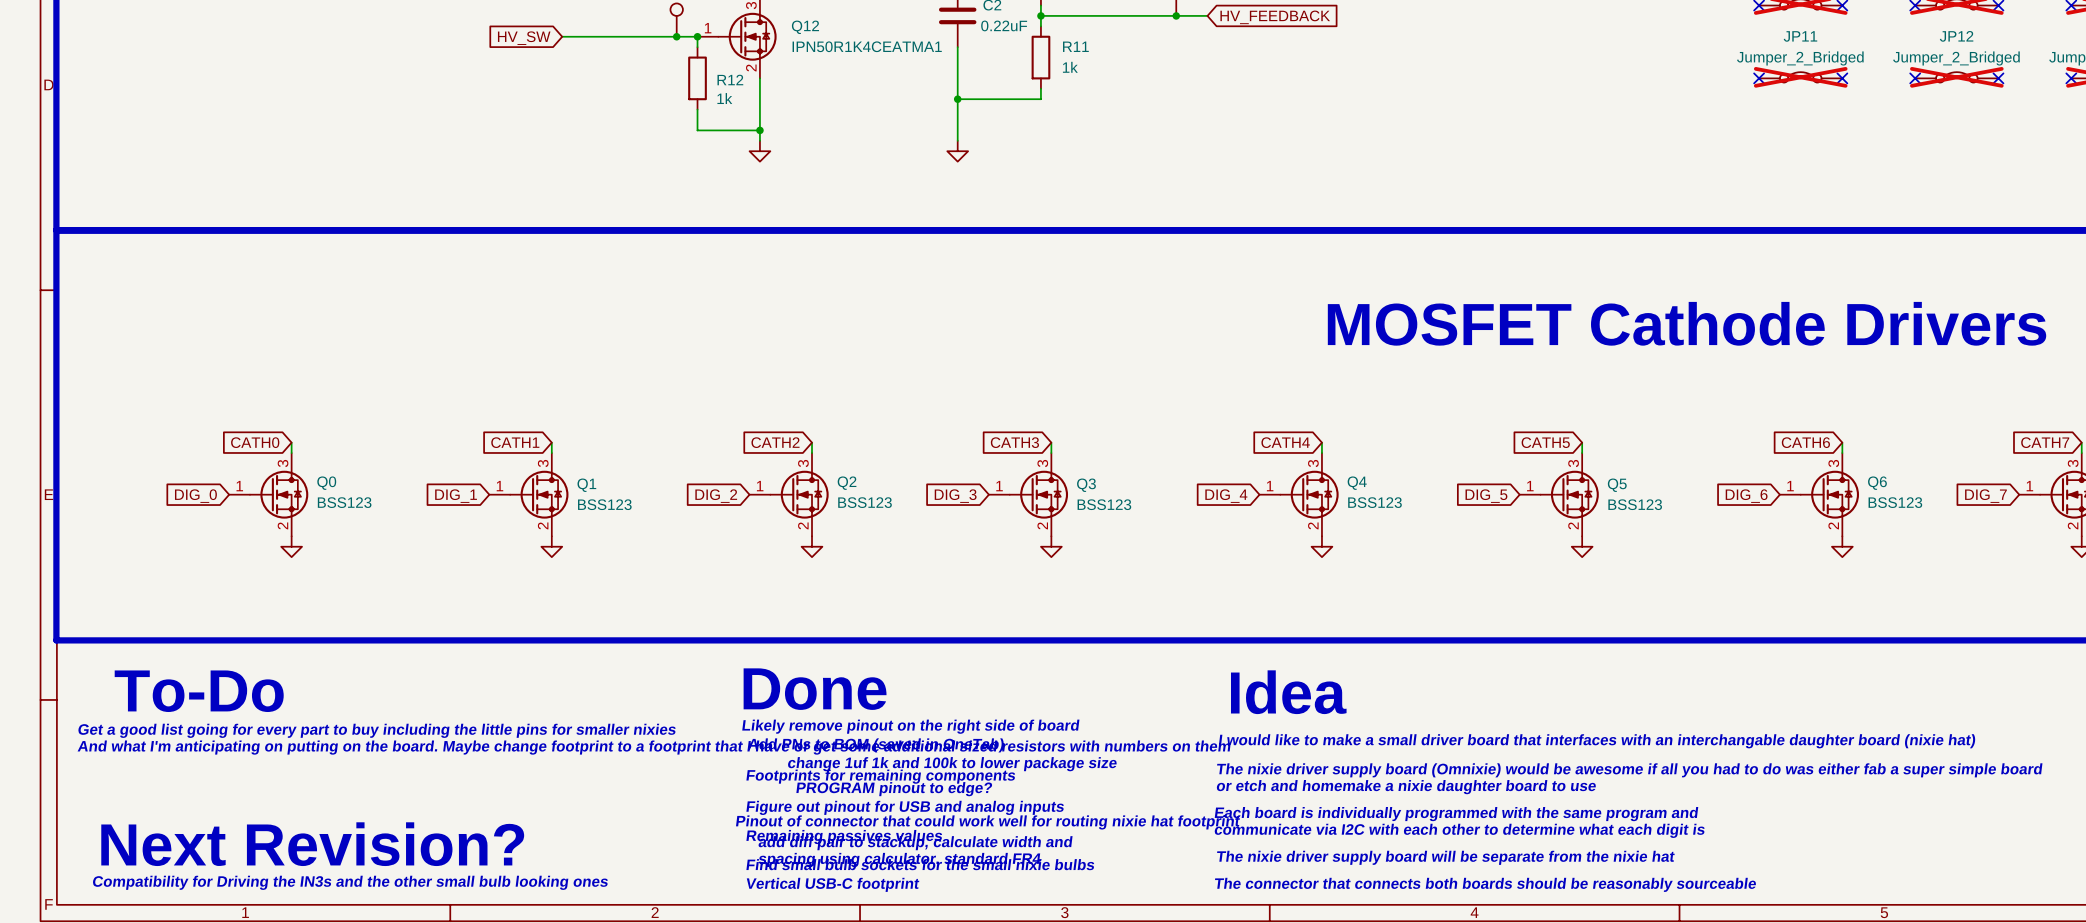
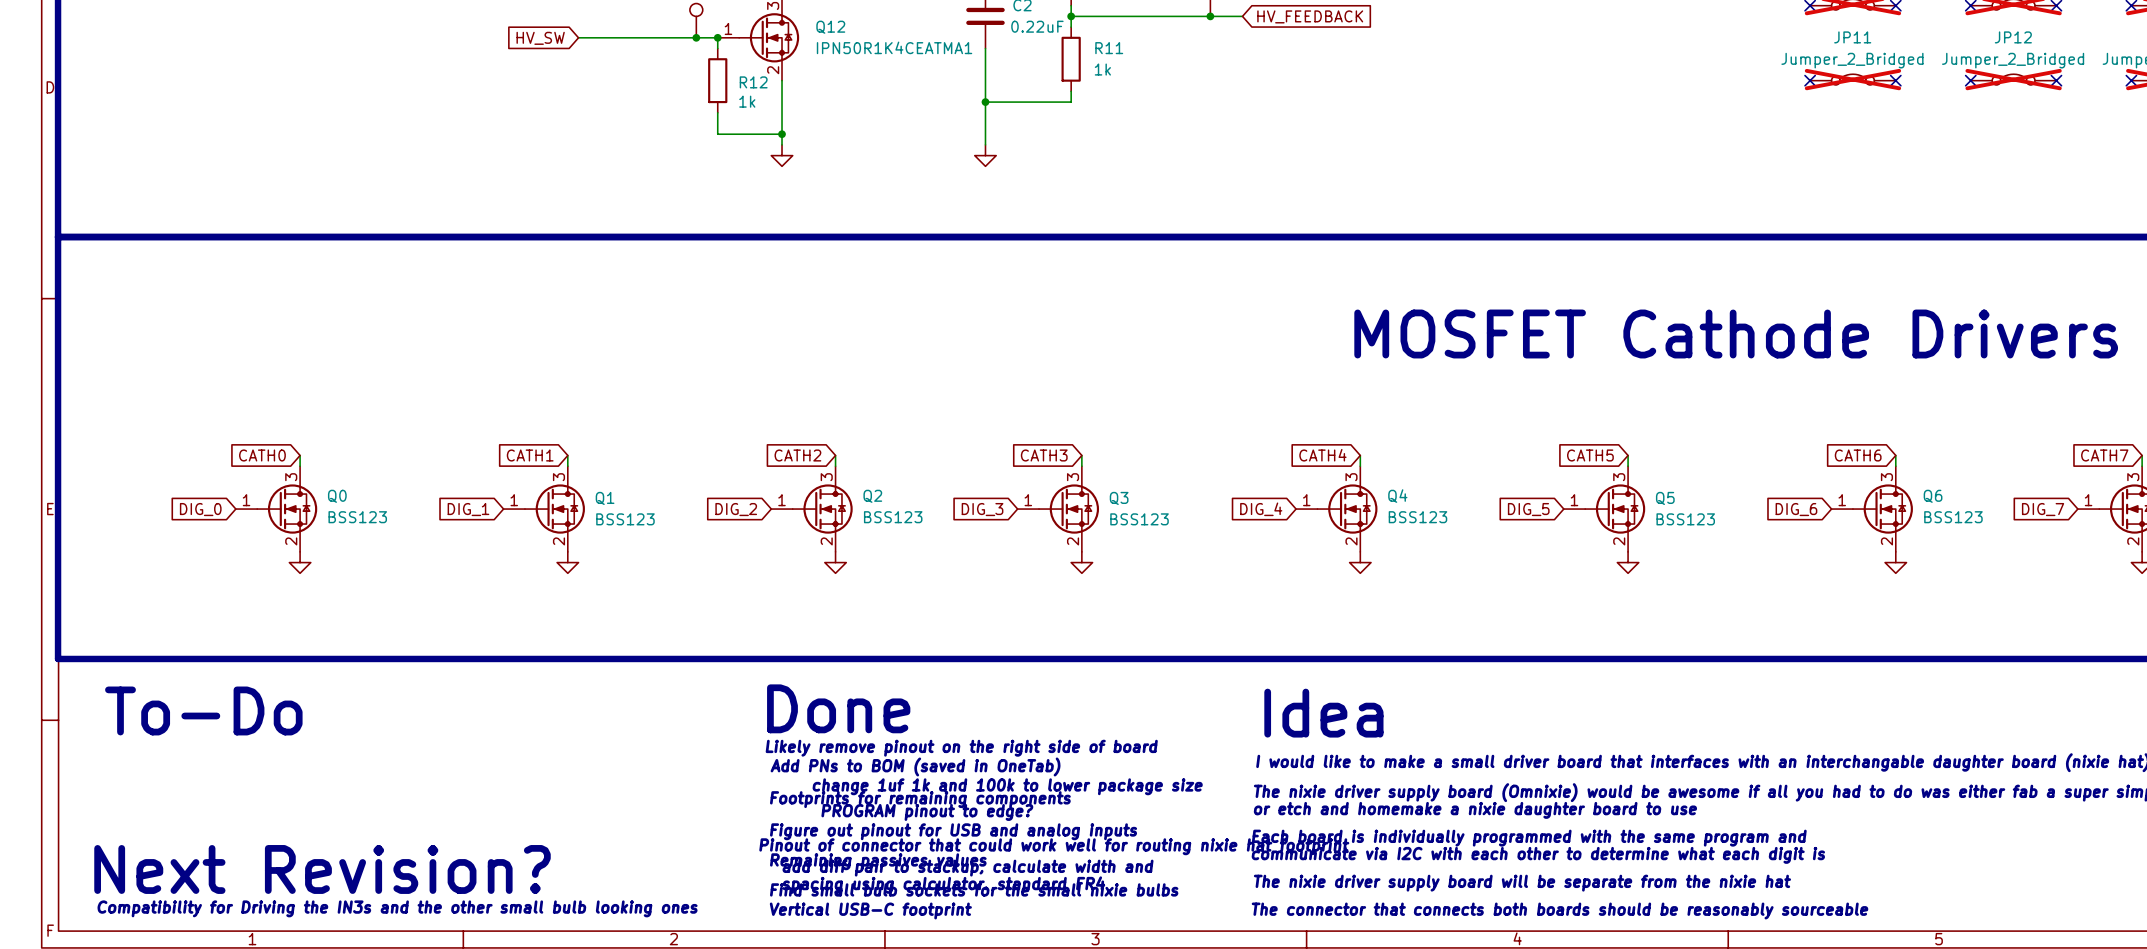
text: Get a good list going for every part to buy including the little pins for smaller nixies (376, 730) -> none
text: And what I'm anticipating on putting on the board. Maybe change footprint to a footprint that I have or get some additional sized resistors with numbers on them (654, 747) -> none

